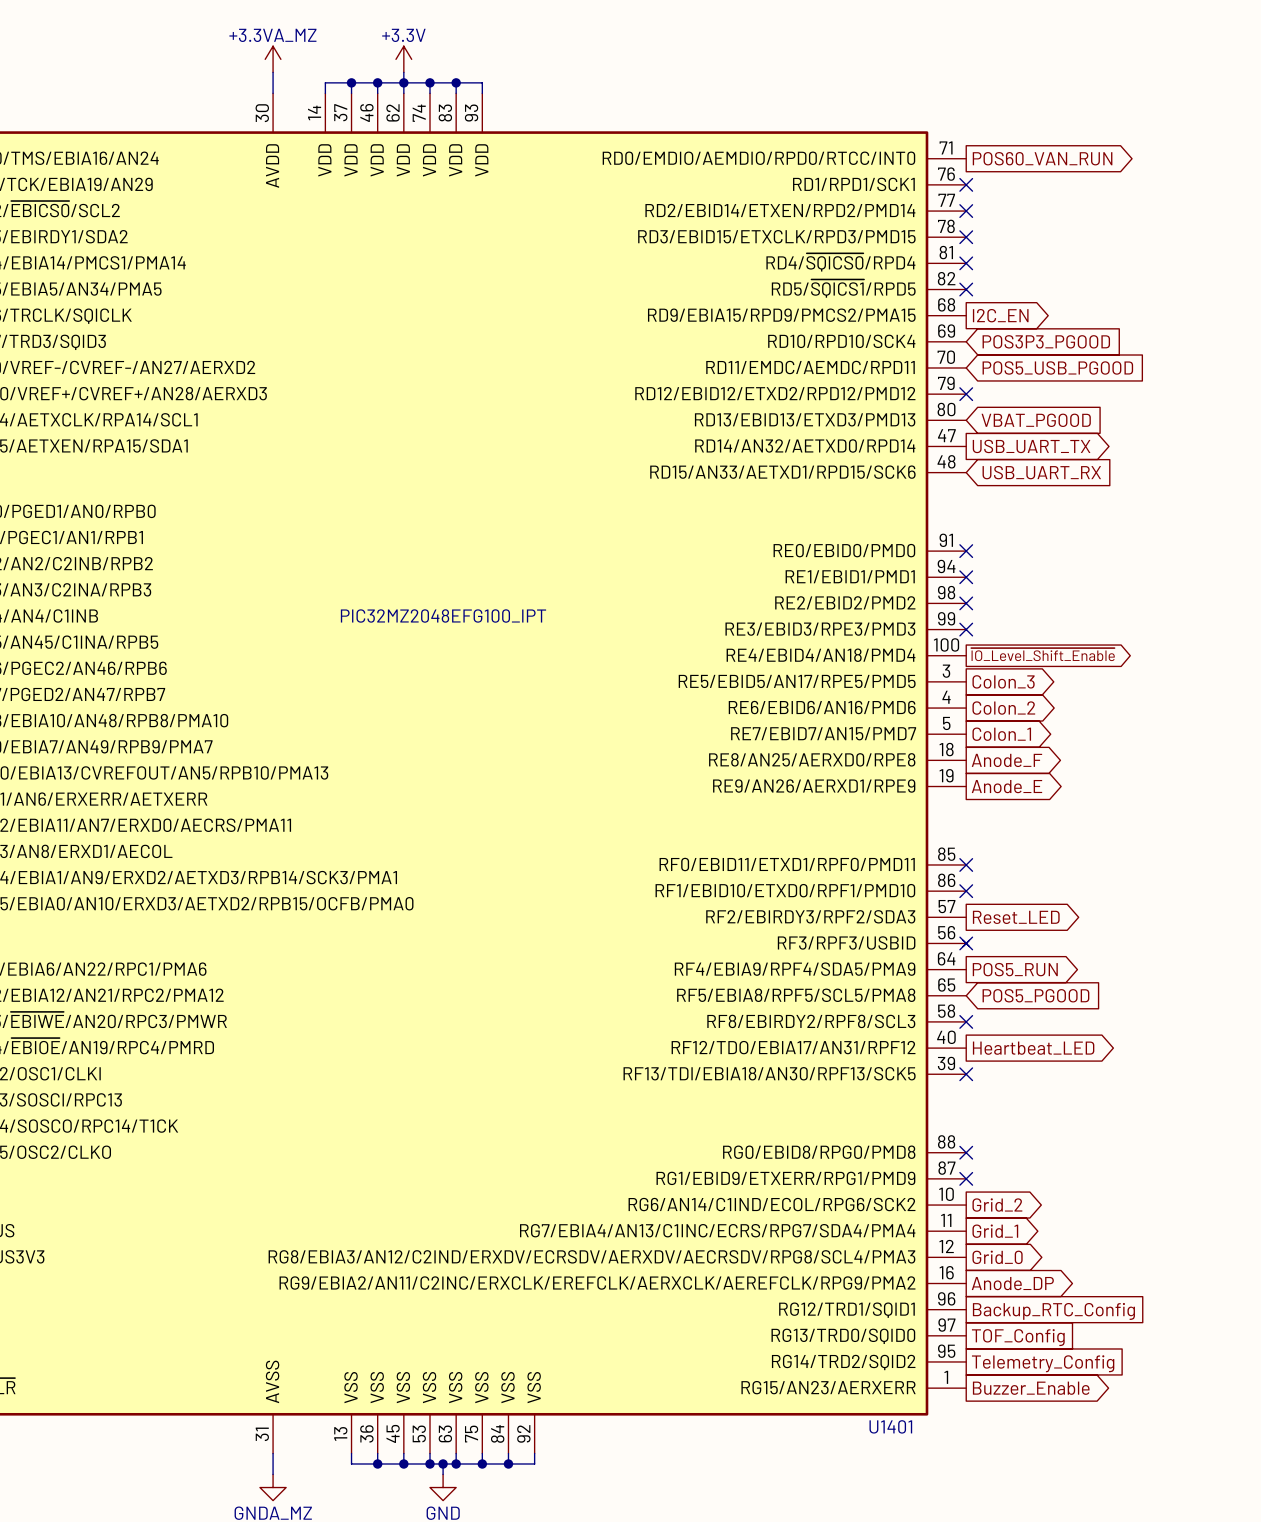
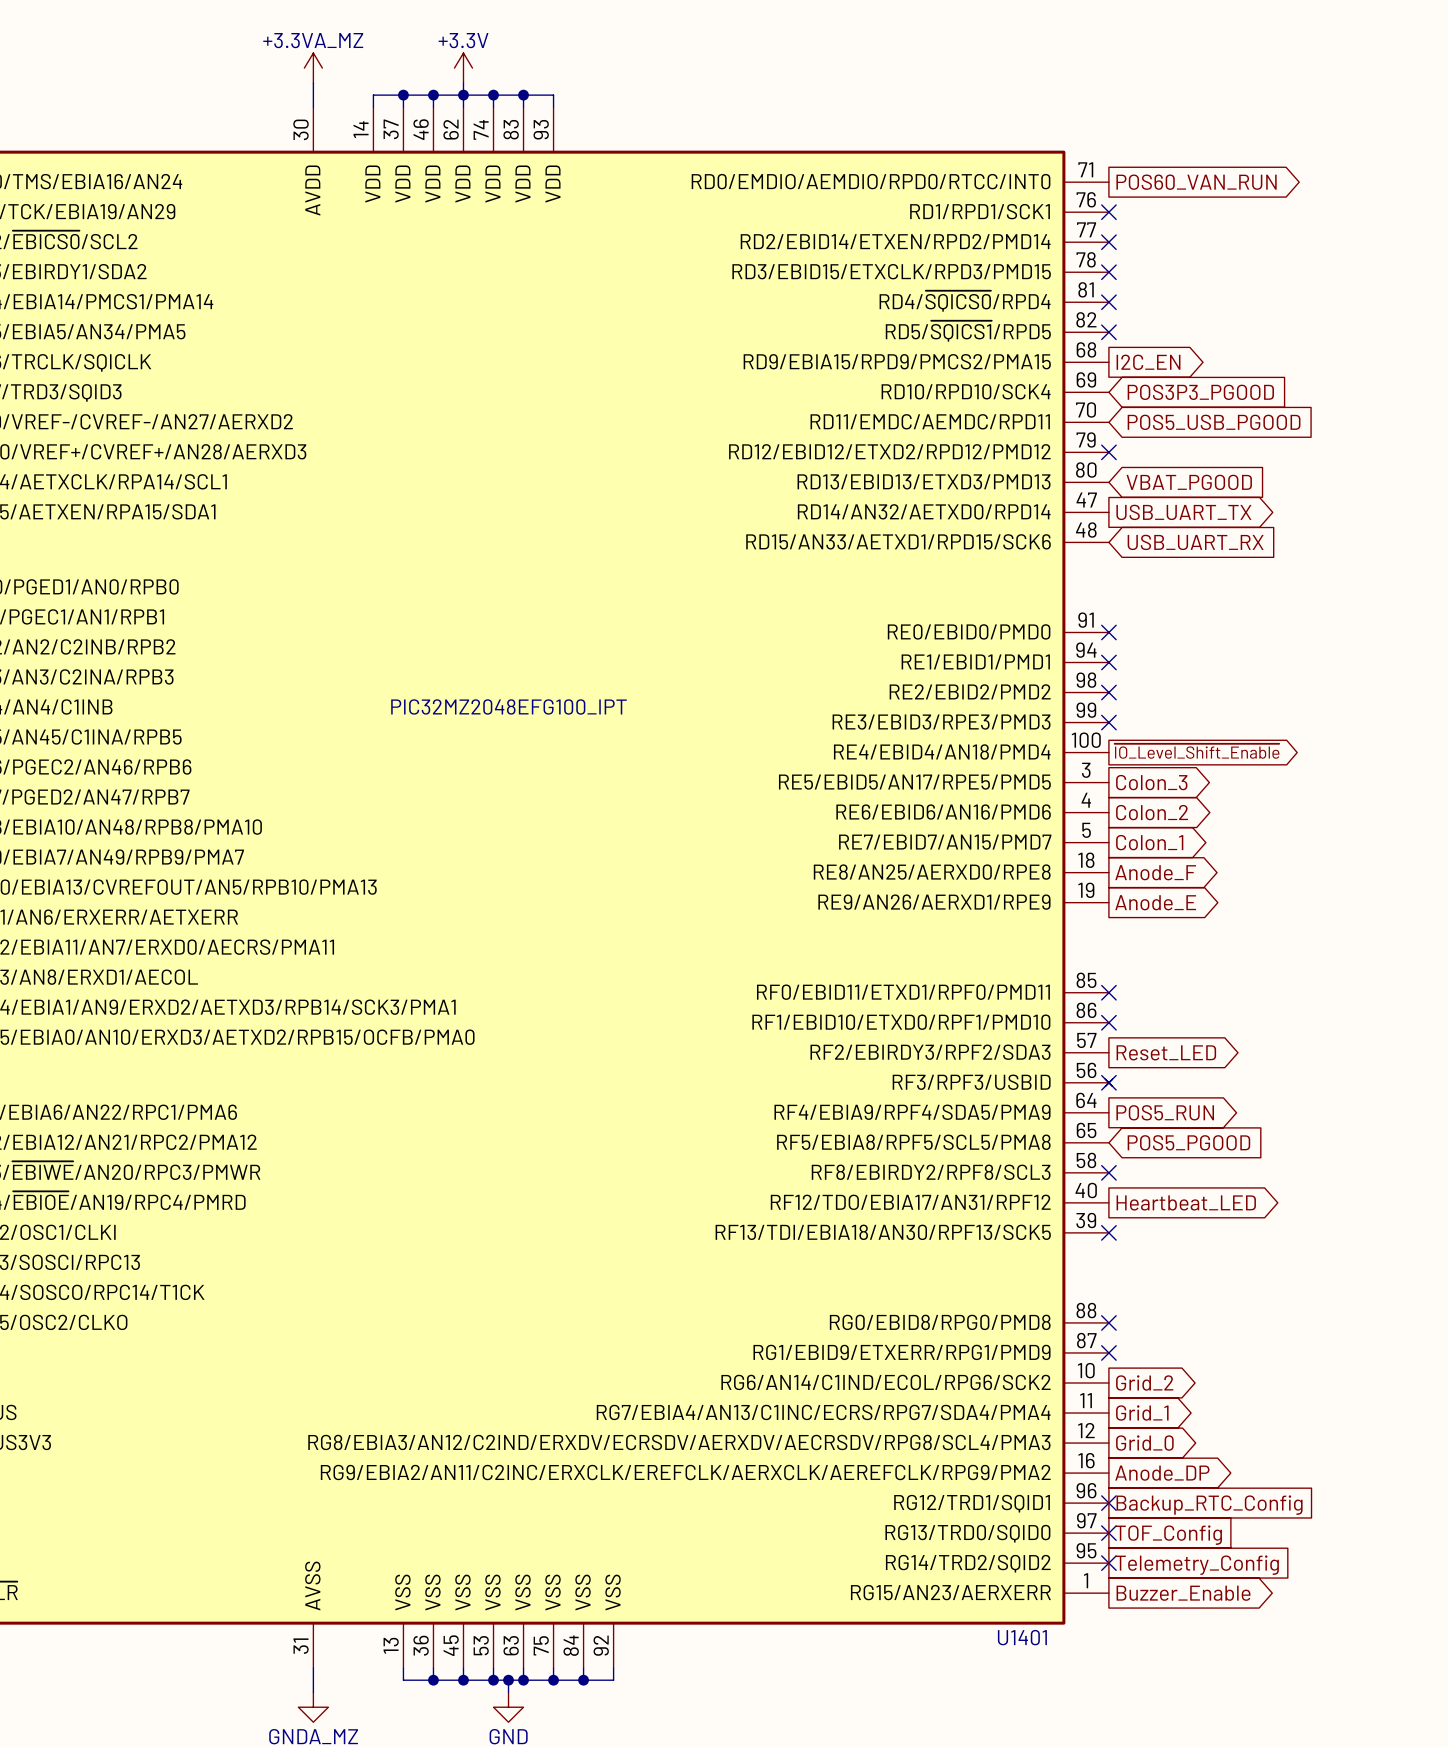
no-connect mark: none -> (1108, 1503)
no-connect mark: none -> (1108, 1533)
no-connect mark: none -> (1108, 1563)

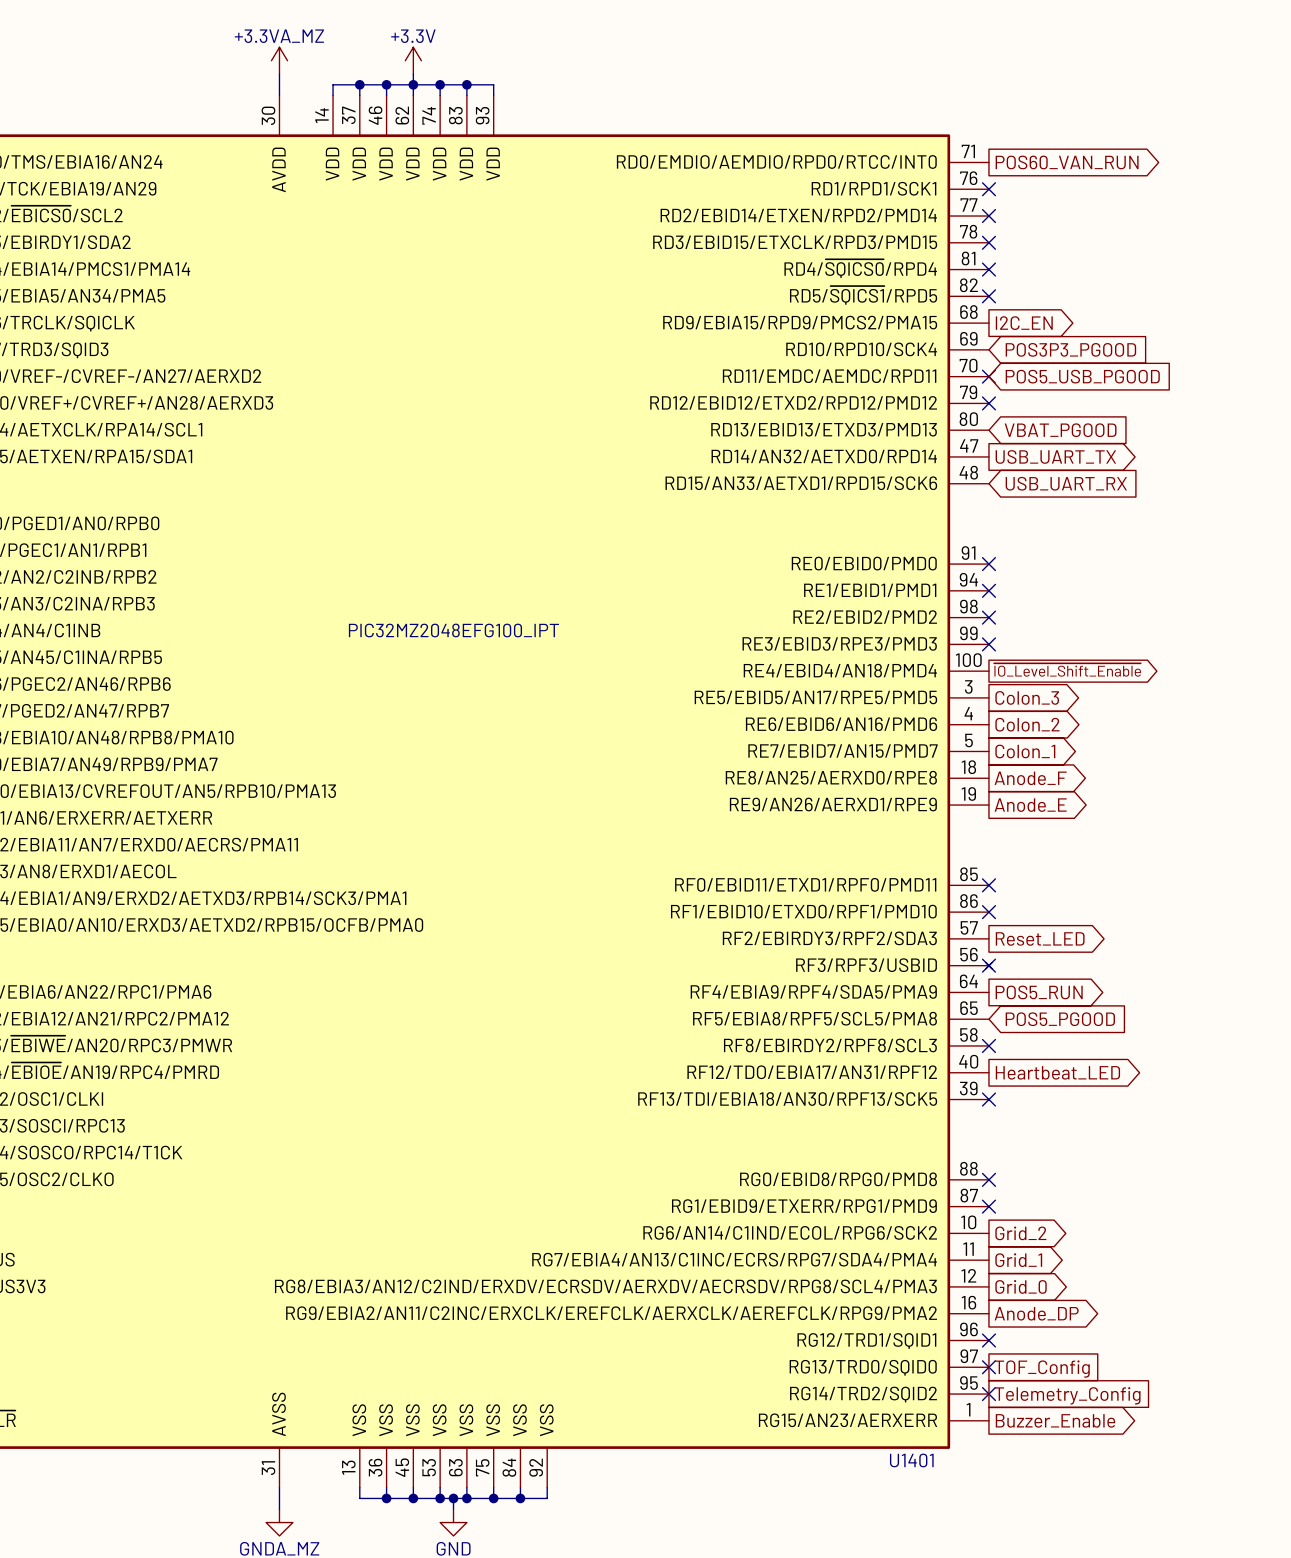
no-connect mark: none -> (988, 376)
global label: Backup_RTC_Config (1209, 1505) -> none

